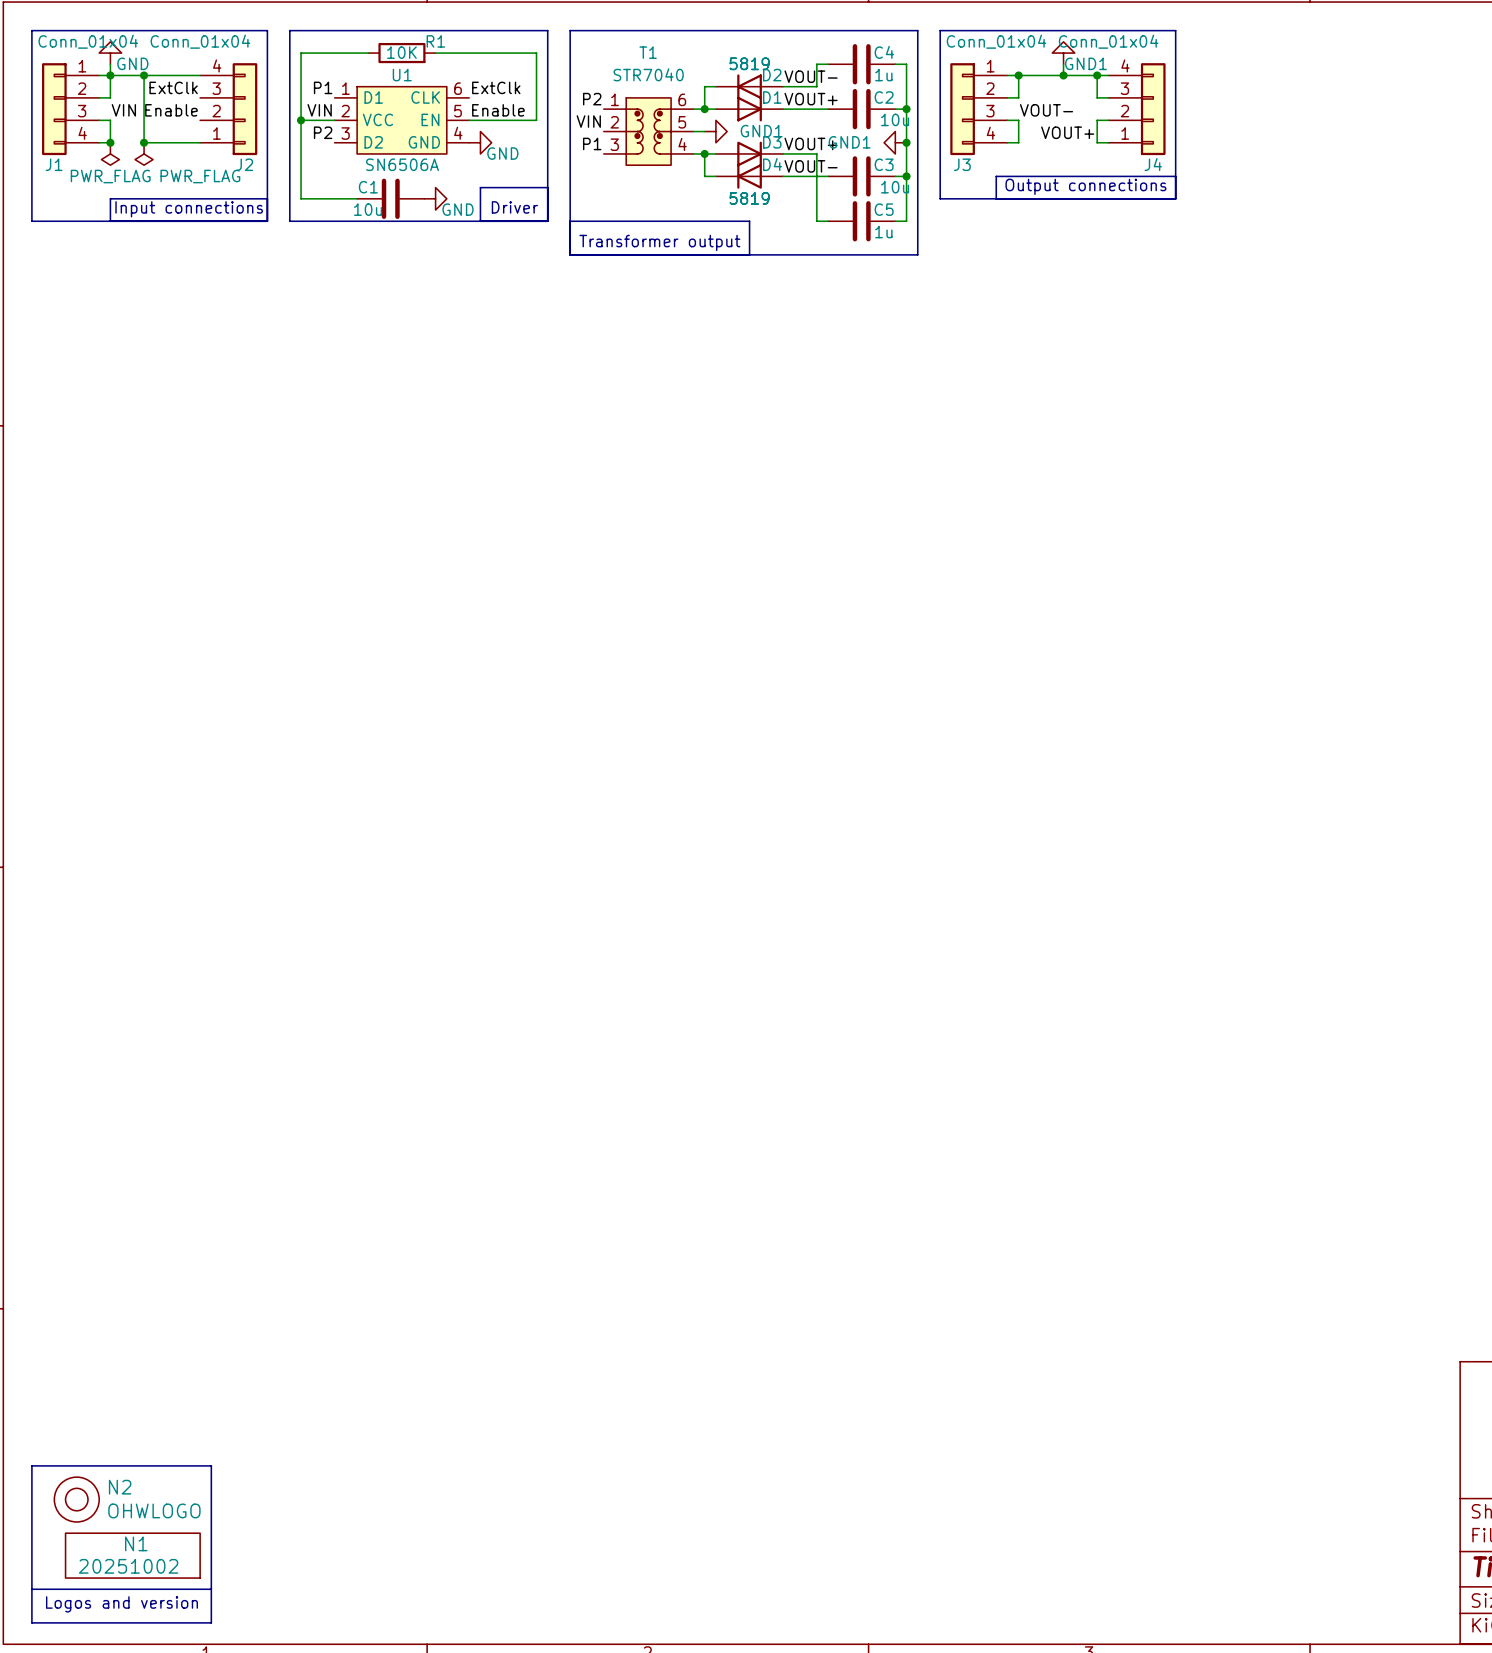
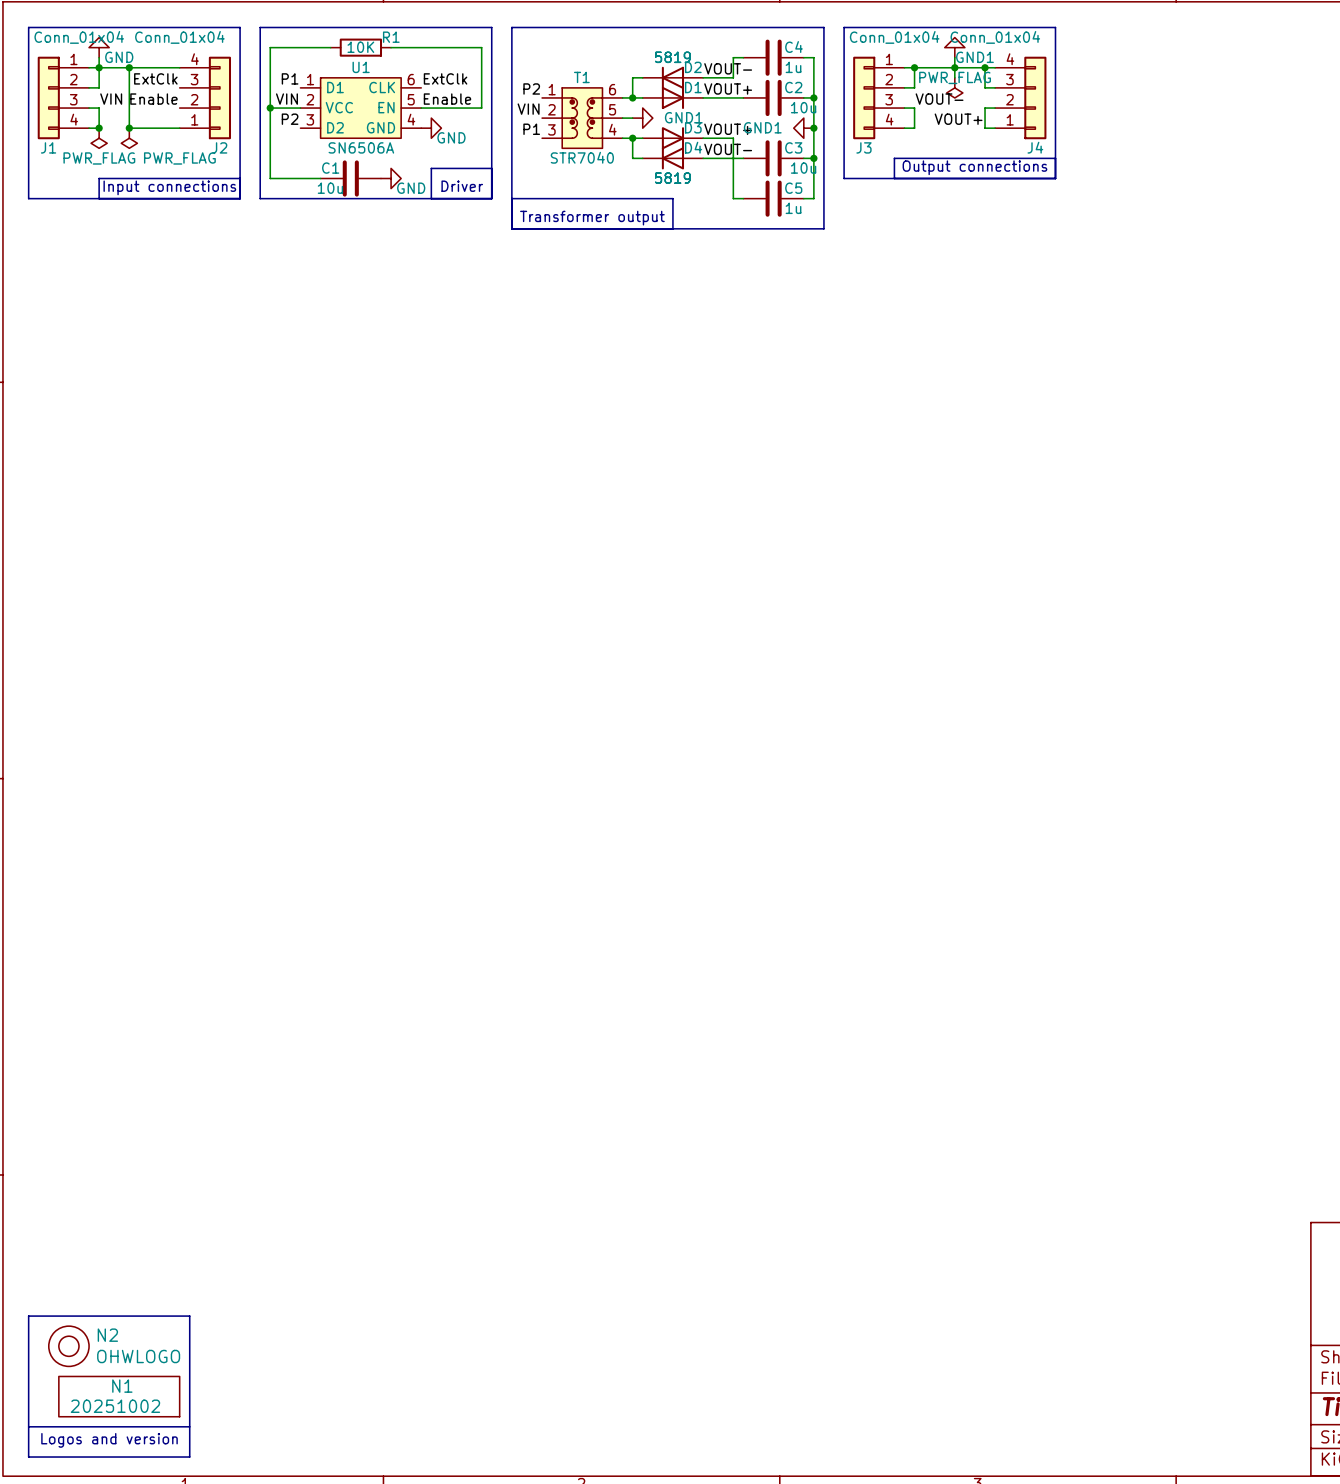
T1 name position: T1 (648, 52) -> T1 (581, 77)
T1 value position: STR7040 (648, 74) -> STR7040 (582, 157)
wire: none -> (954, 67) (954, 77)
power symbol: none -> PWR_FLAG (954, 87)

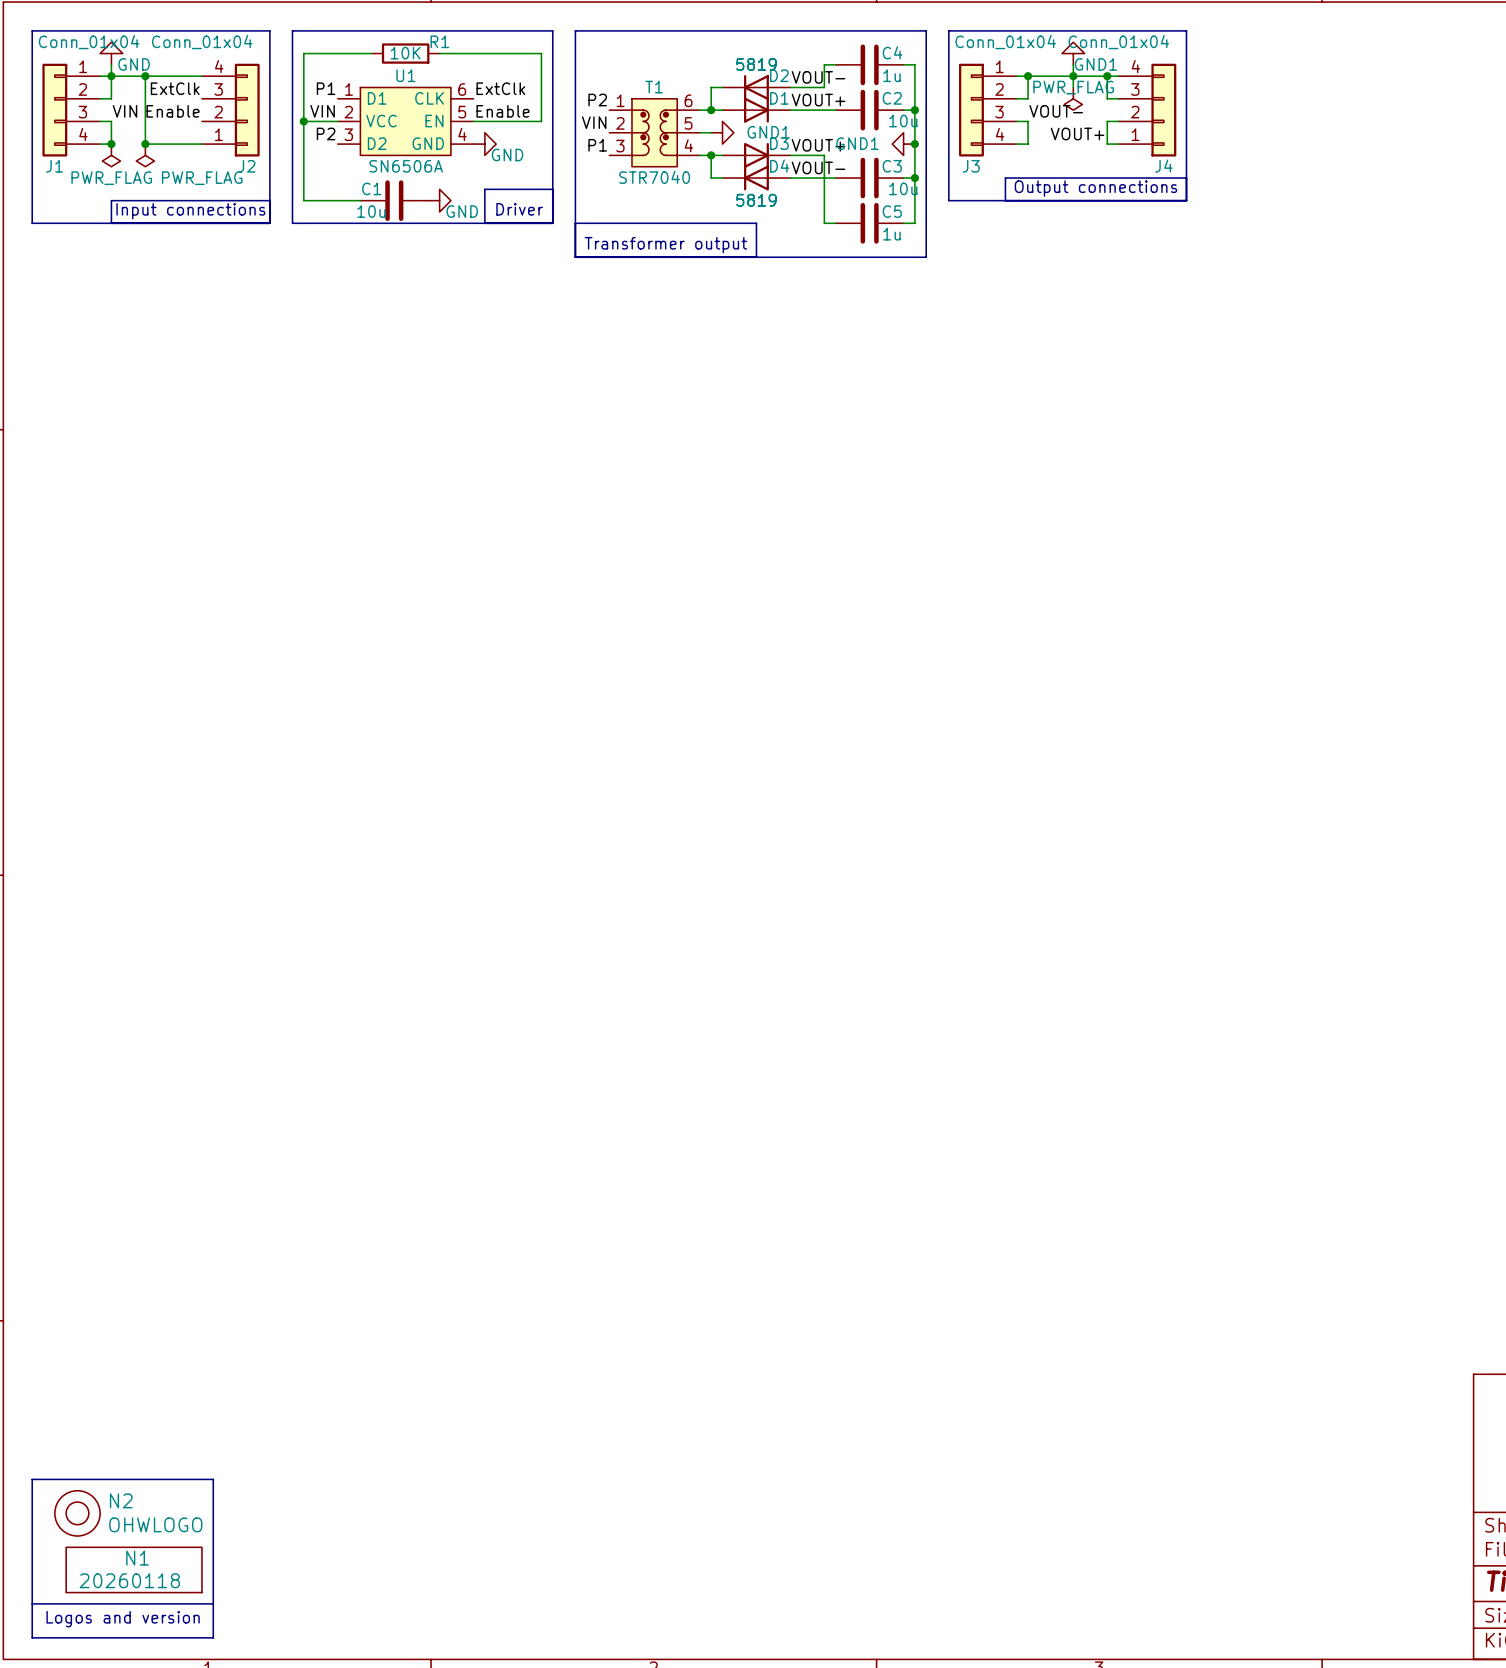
N1 value: 20251002 (115, 1406) -> 20260118 (129, 1580)

